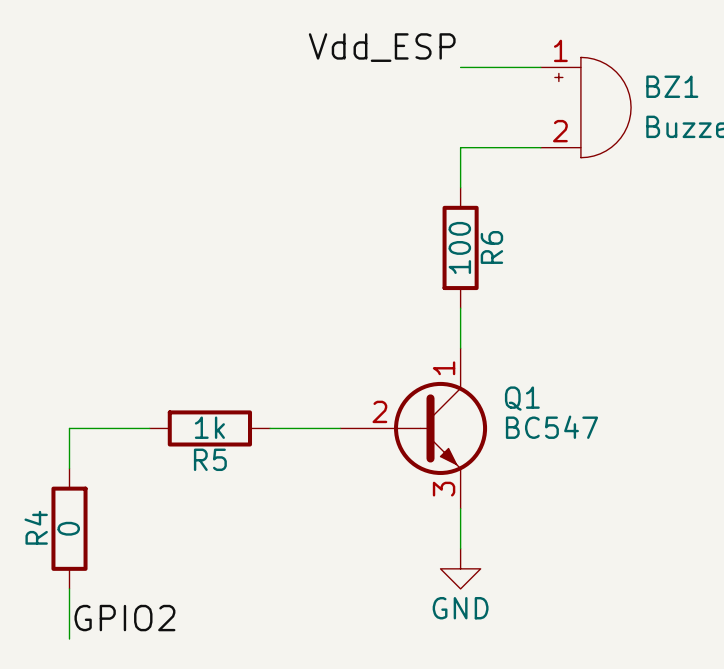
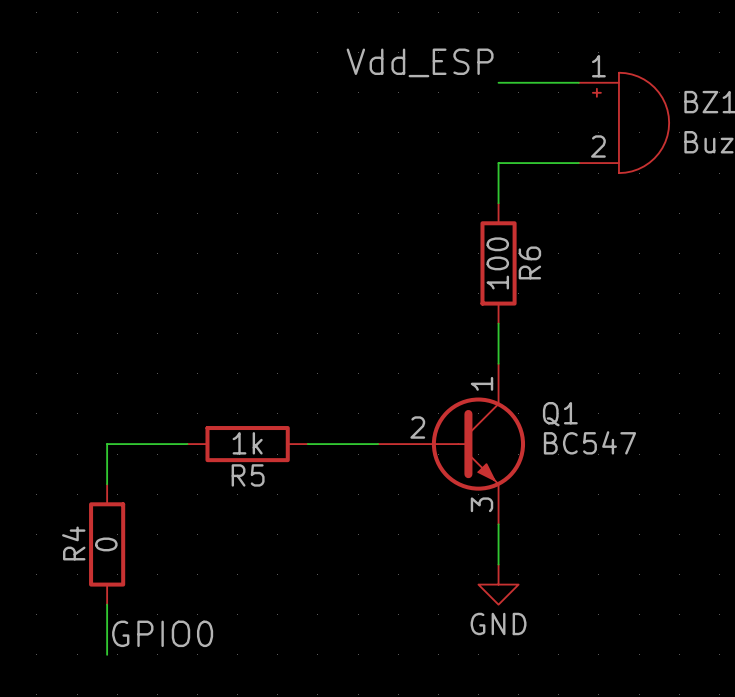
label: GPIO2 (124, 618) -> GPIO0 (162, 633)

